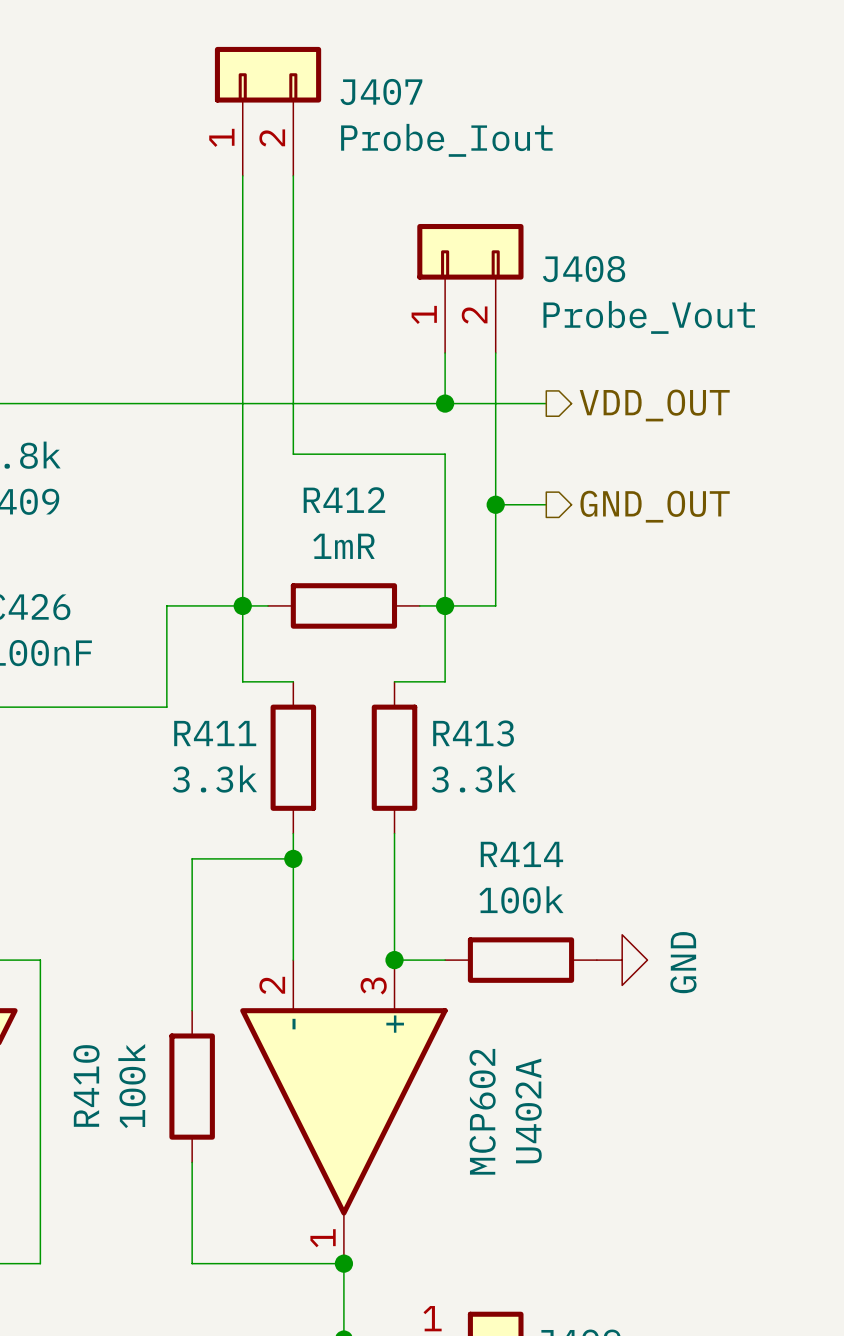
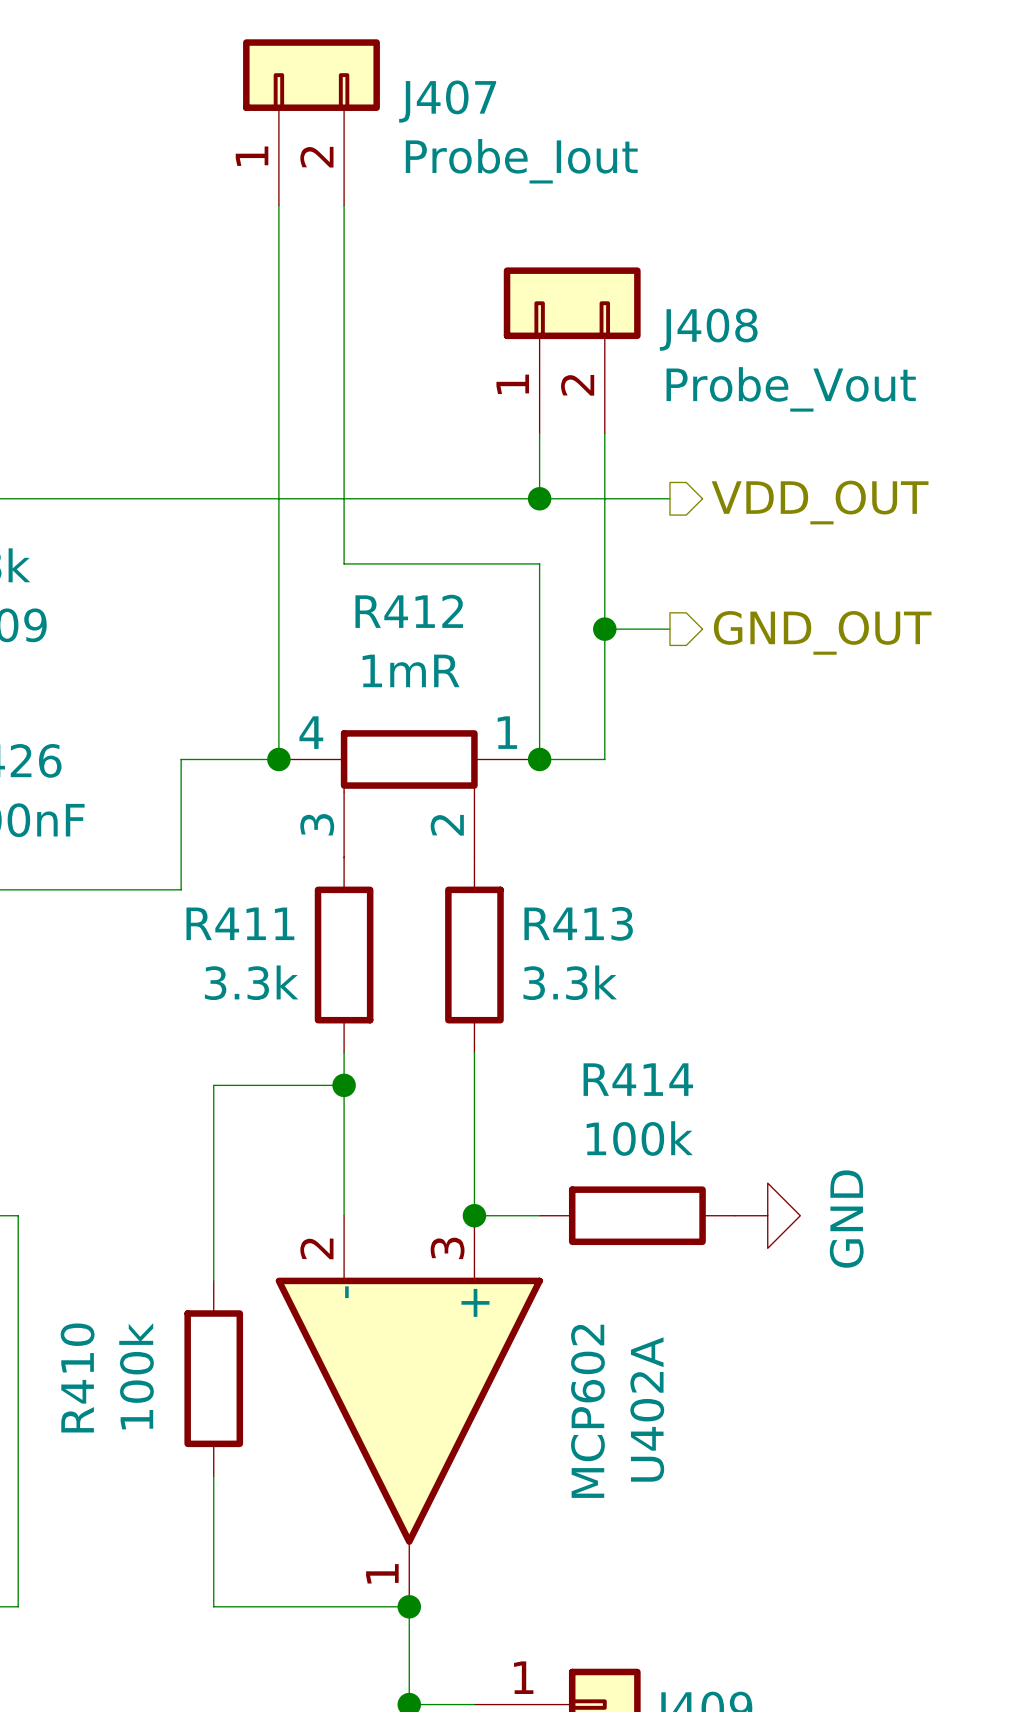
R412 symbol: [268, 583, 420, 629] -> [278, 730, 540, 858]
wire: (268, 605) (242, 605) (242, 681) (293, 681) -> none
wire: (419, 605) (445, 605) (445, 681) (394, 681) -> none

